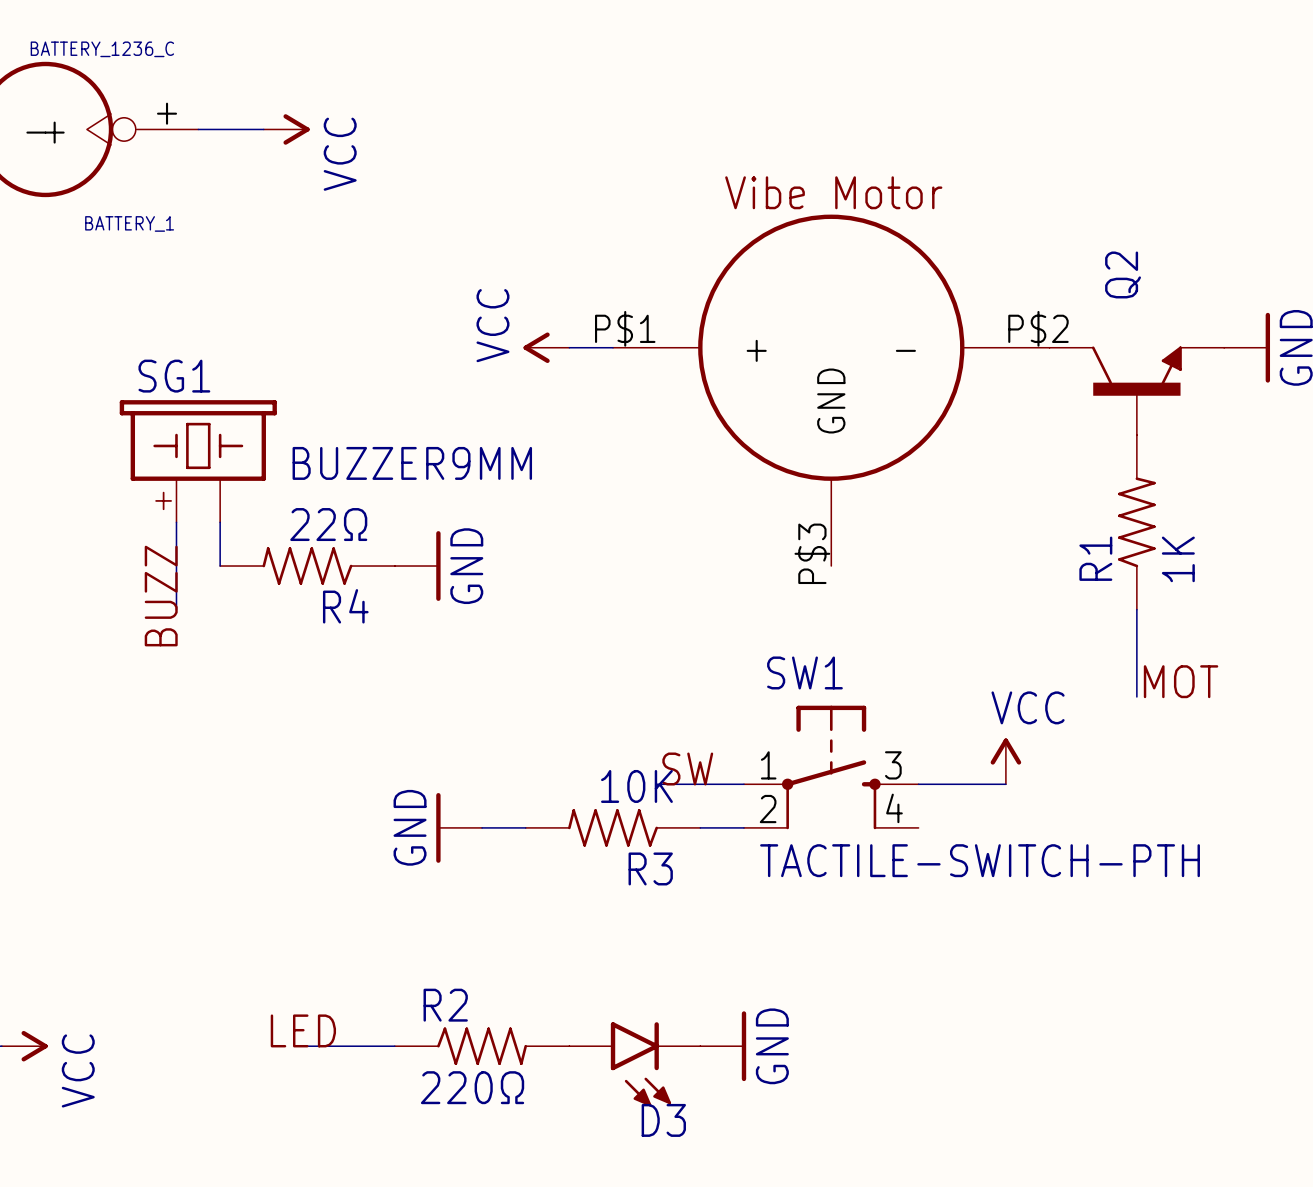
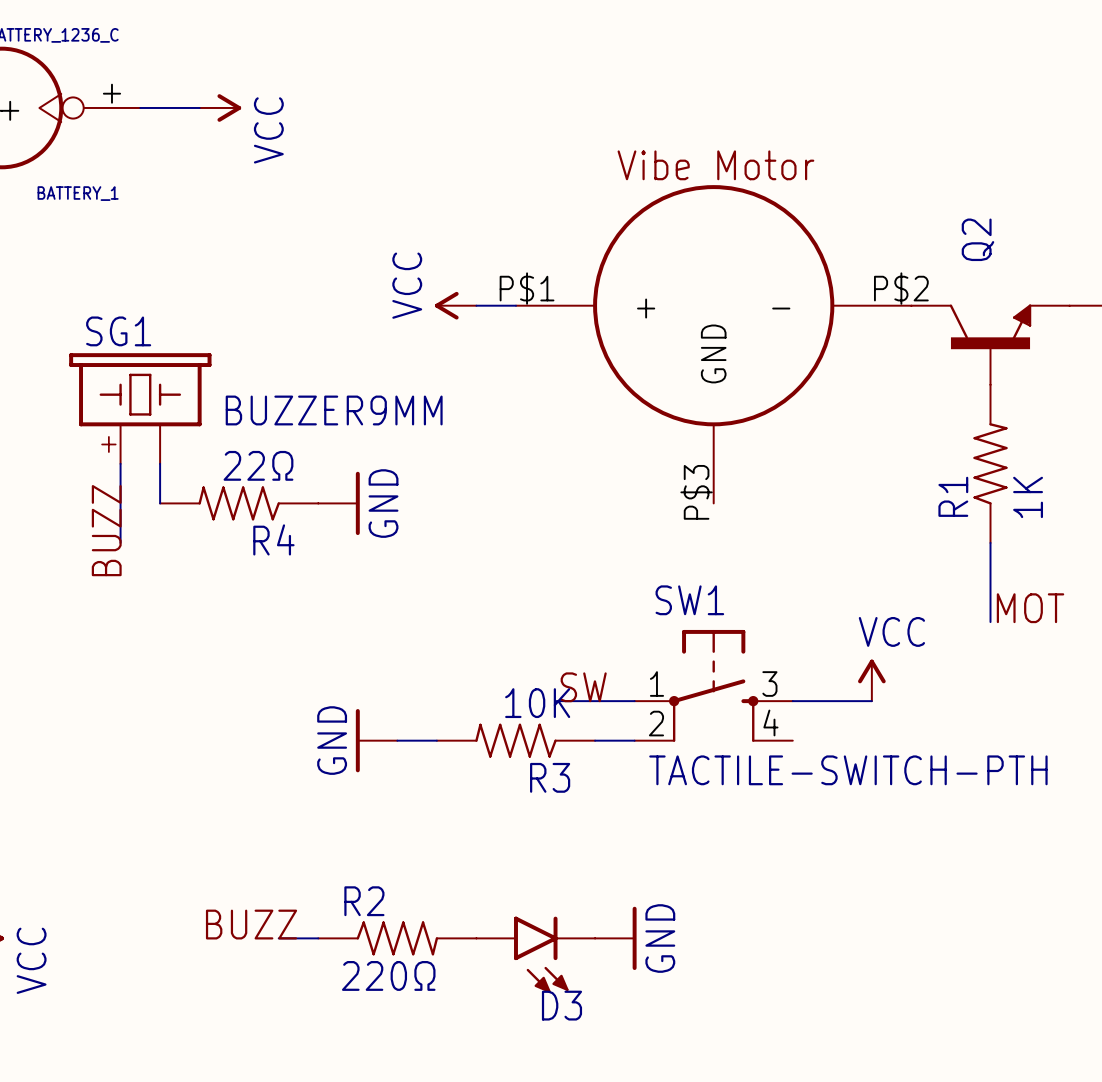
label: LED (303, 1030) -> BUZZ (251, 924)

